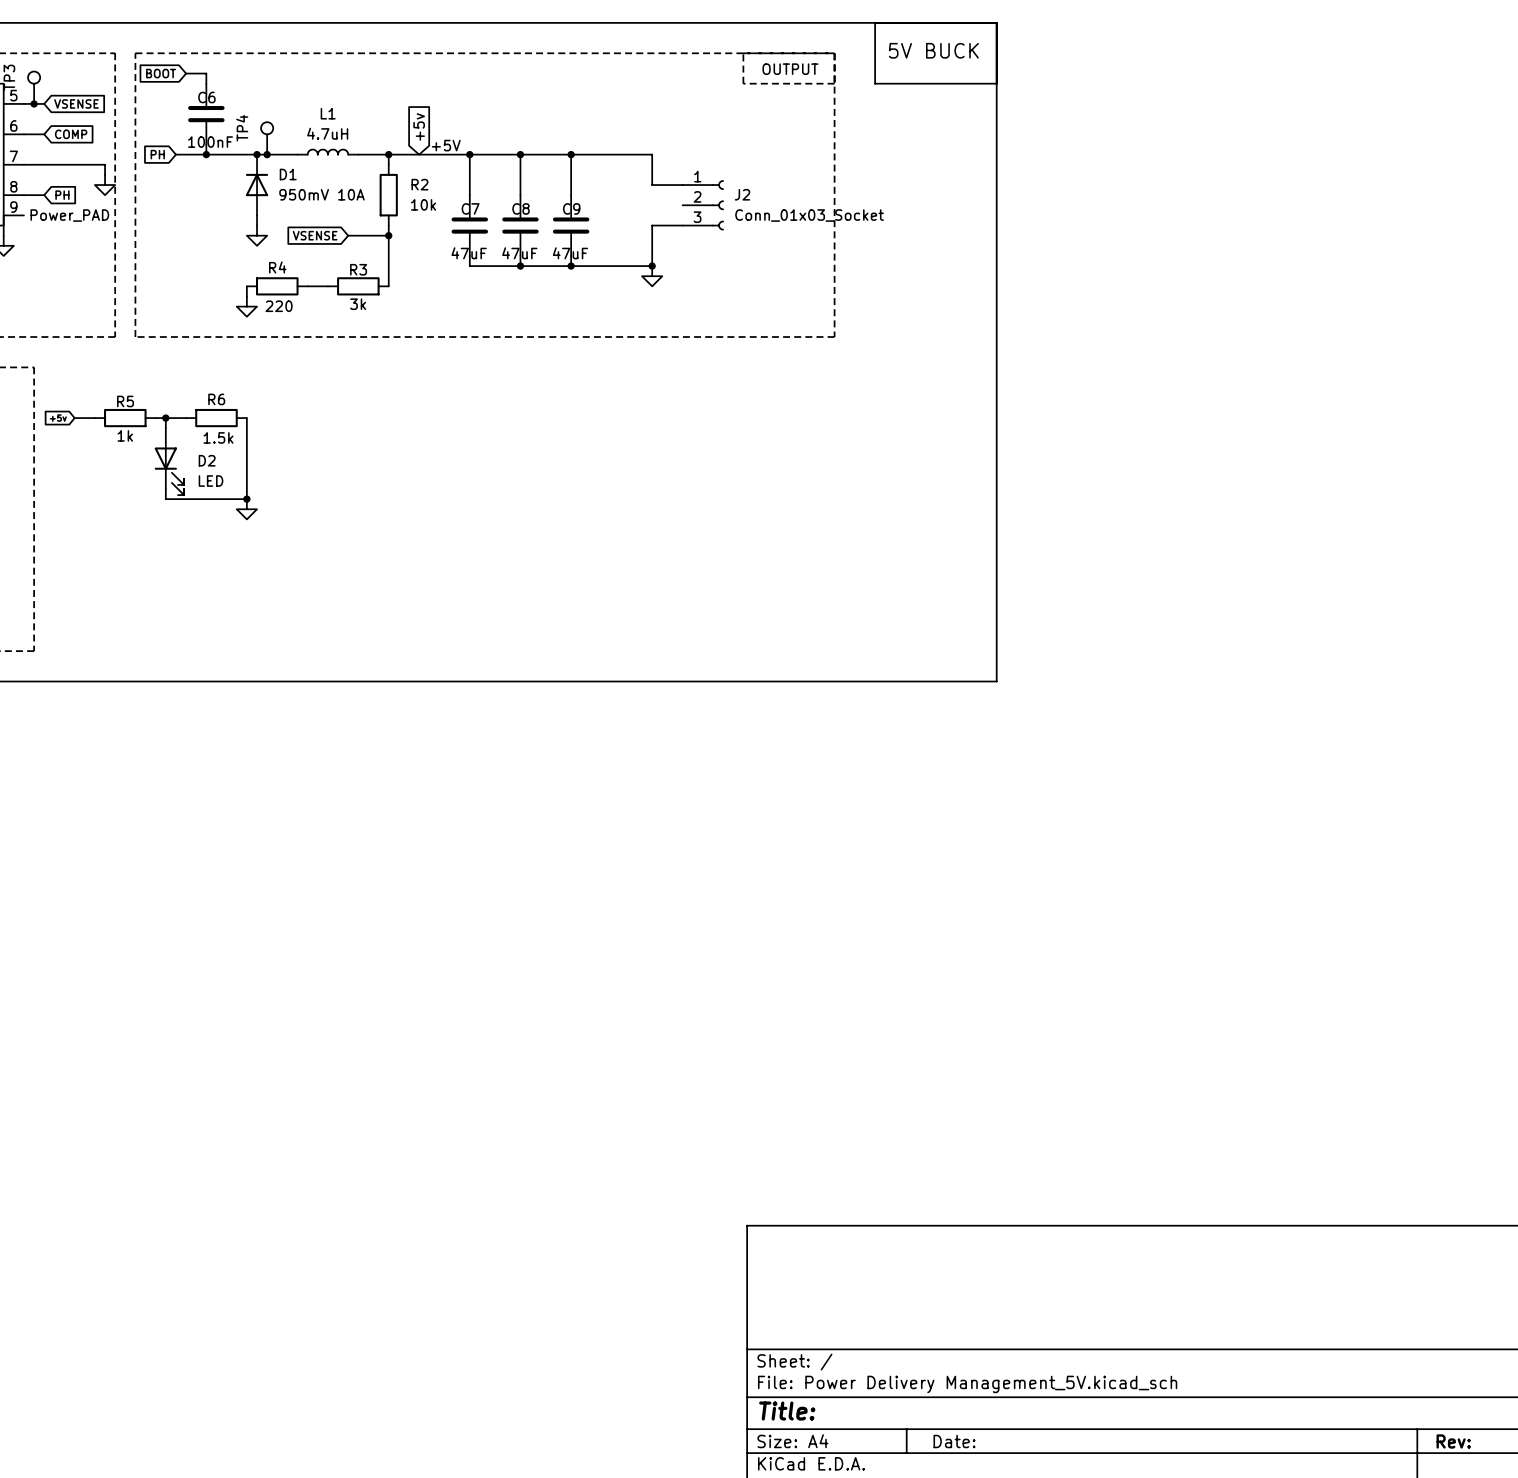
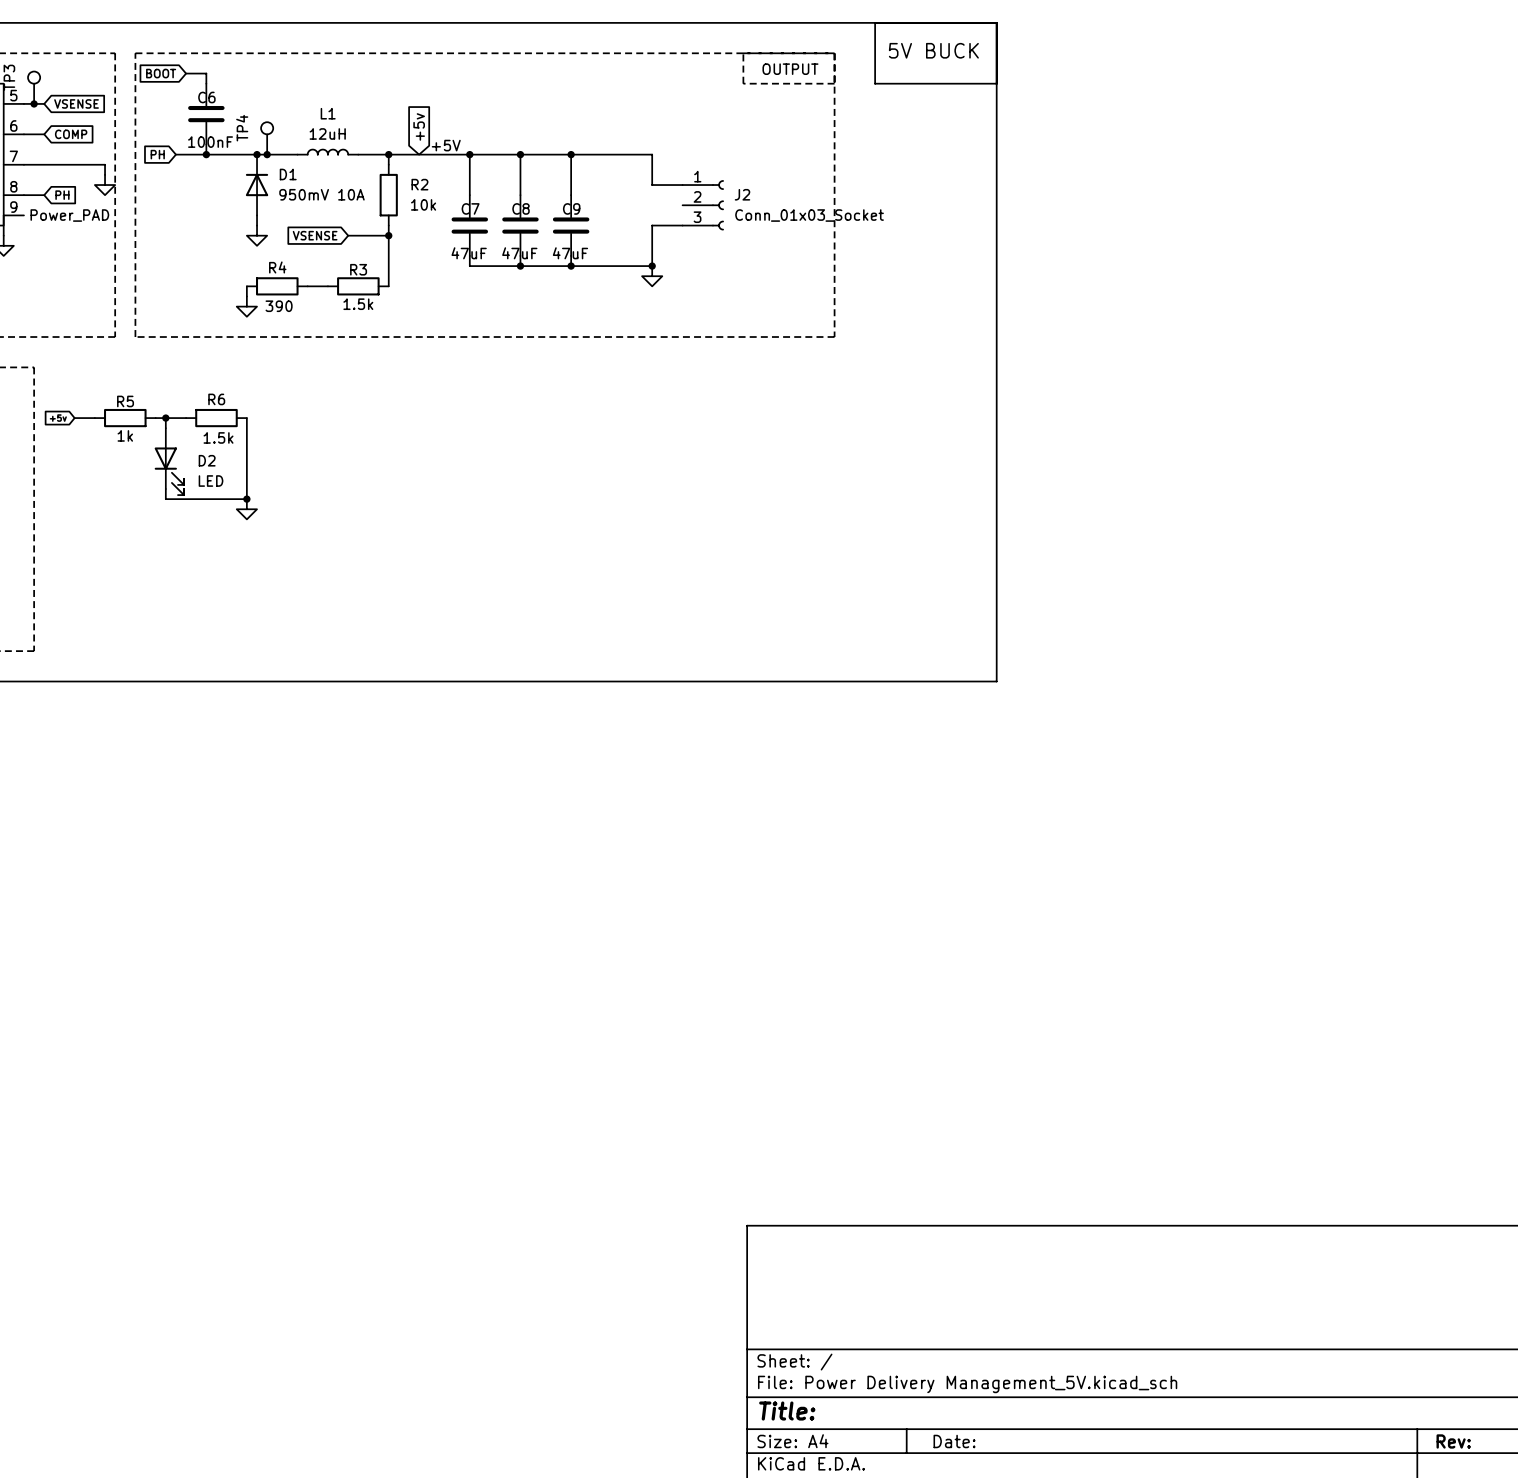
L1 value: 4.7uH (327, 133) -> 12uH (327, 133)
R3 value: 3k (358, 304) -> 1.5k (358, 304)
R4 value: 220 (279, 306) -> 390 (279, 306)

